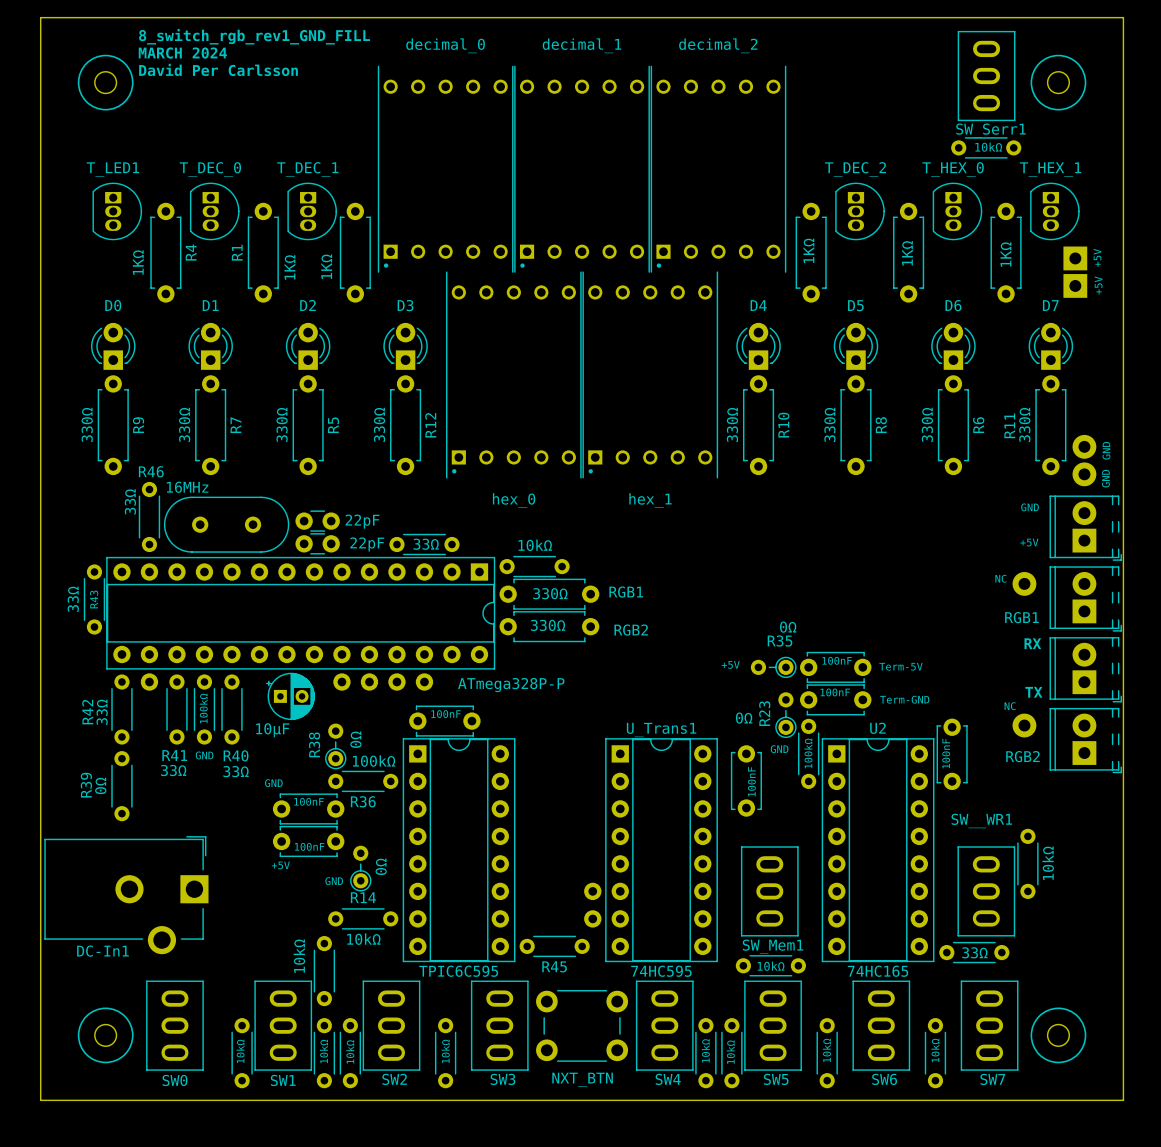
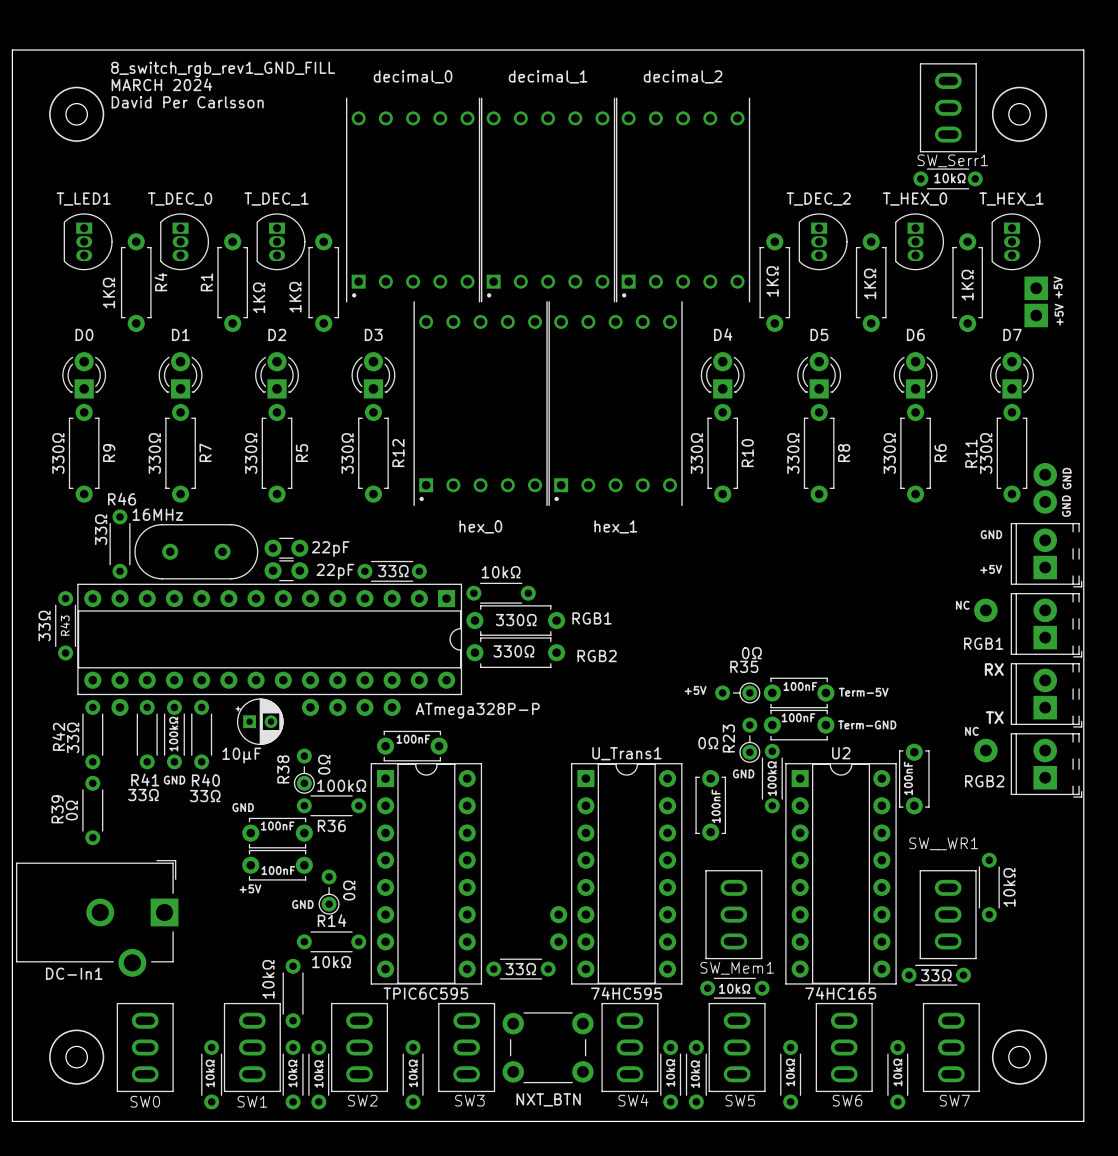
R45 value: none -> 33Ω (520, 969)
R45 name: R45 (554, 966) -> none

